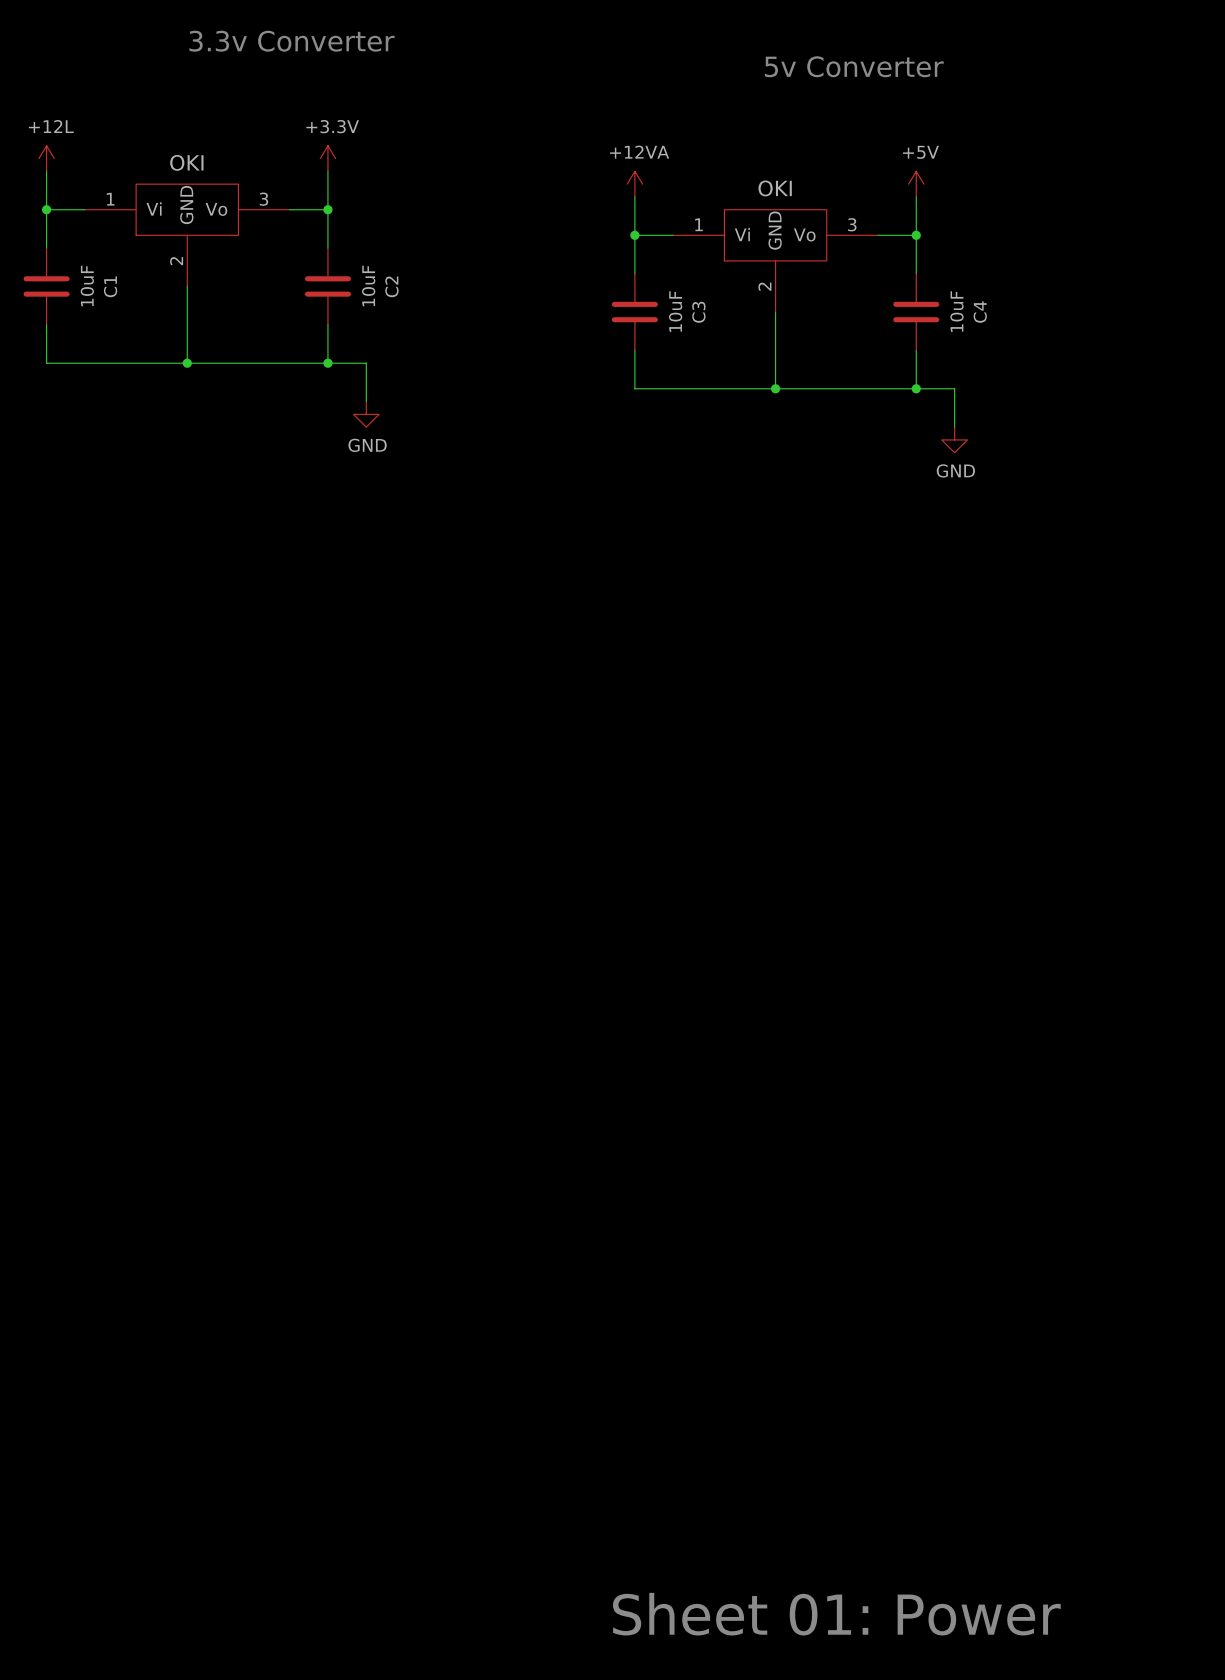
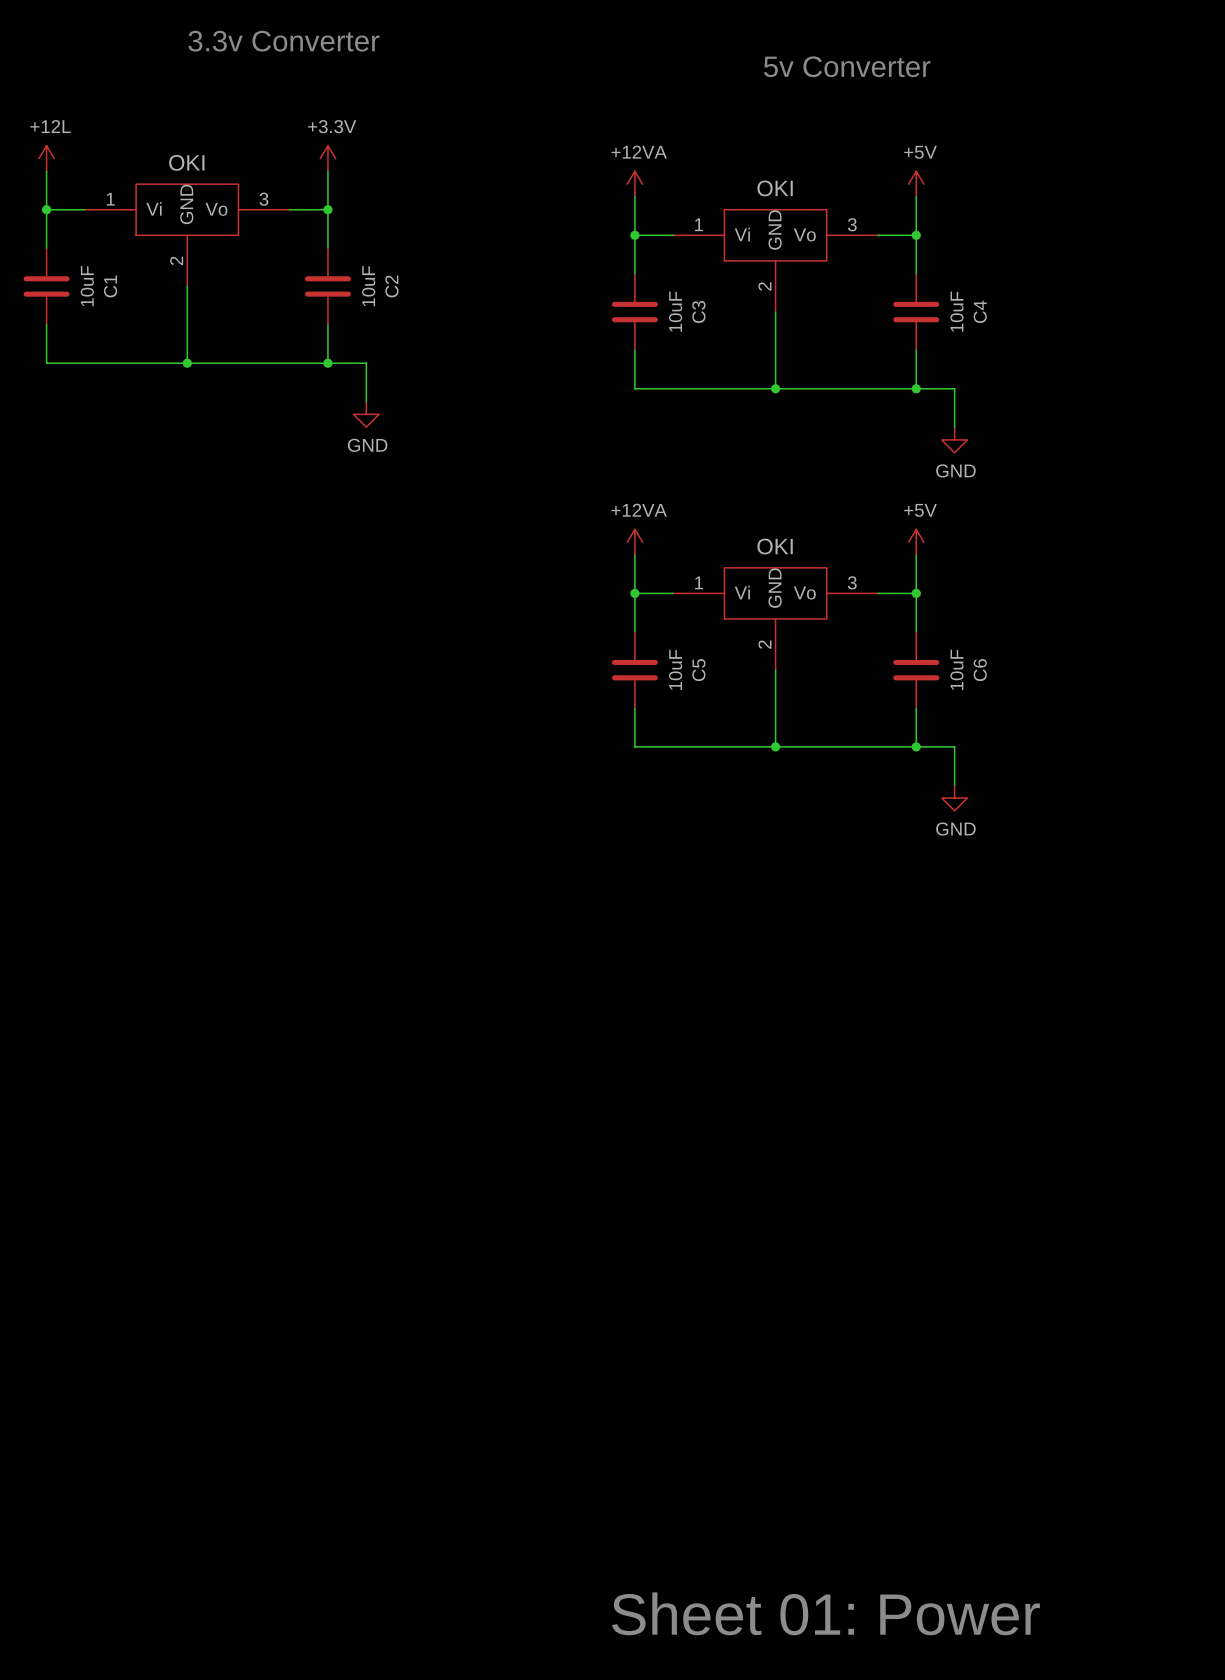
power symbol: none -> +12VA (634, 542)
power symbol: none -> +5V (916, 542)
wire: none -> (634, 555) (634, 631)
wire: none -> (916, 555) (916, 631)
wire: none -> (634, 593) (673, 593)
junction: none -> (634, 593)
wire: none -> (877, 593) (916, 593)
junction: none -> (916, 593)
part: none -> OKI (775, 619)
C5: none -> 10uF (634, 670)
wire: none -> (775, 670) (775, 746)
C6: none -> 10uF (916, 670)
wire: none -> (634, 708) (634, 746) (954, 746) (954, 785)
wire: none -> (916, 708) (916, 746)
junction: none -> (775, 746)
junction: none -> (916, 746)
power symbol: none -> GND (954, 798)

